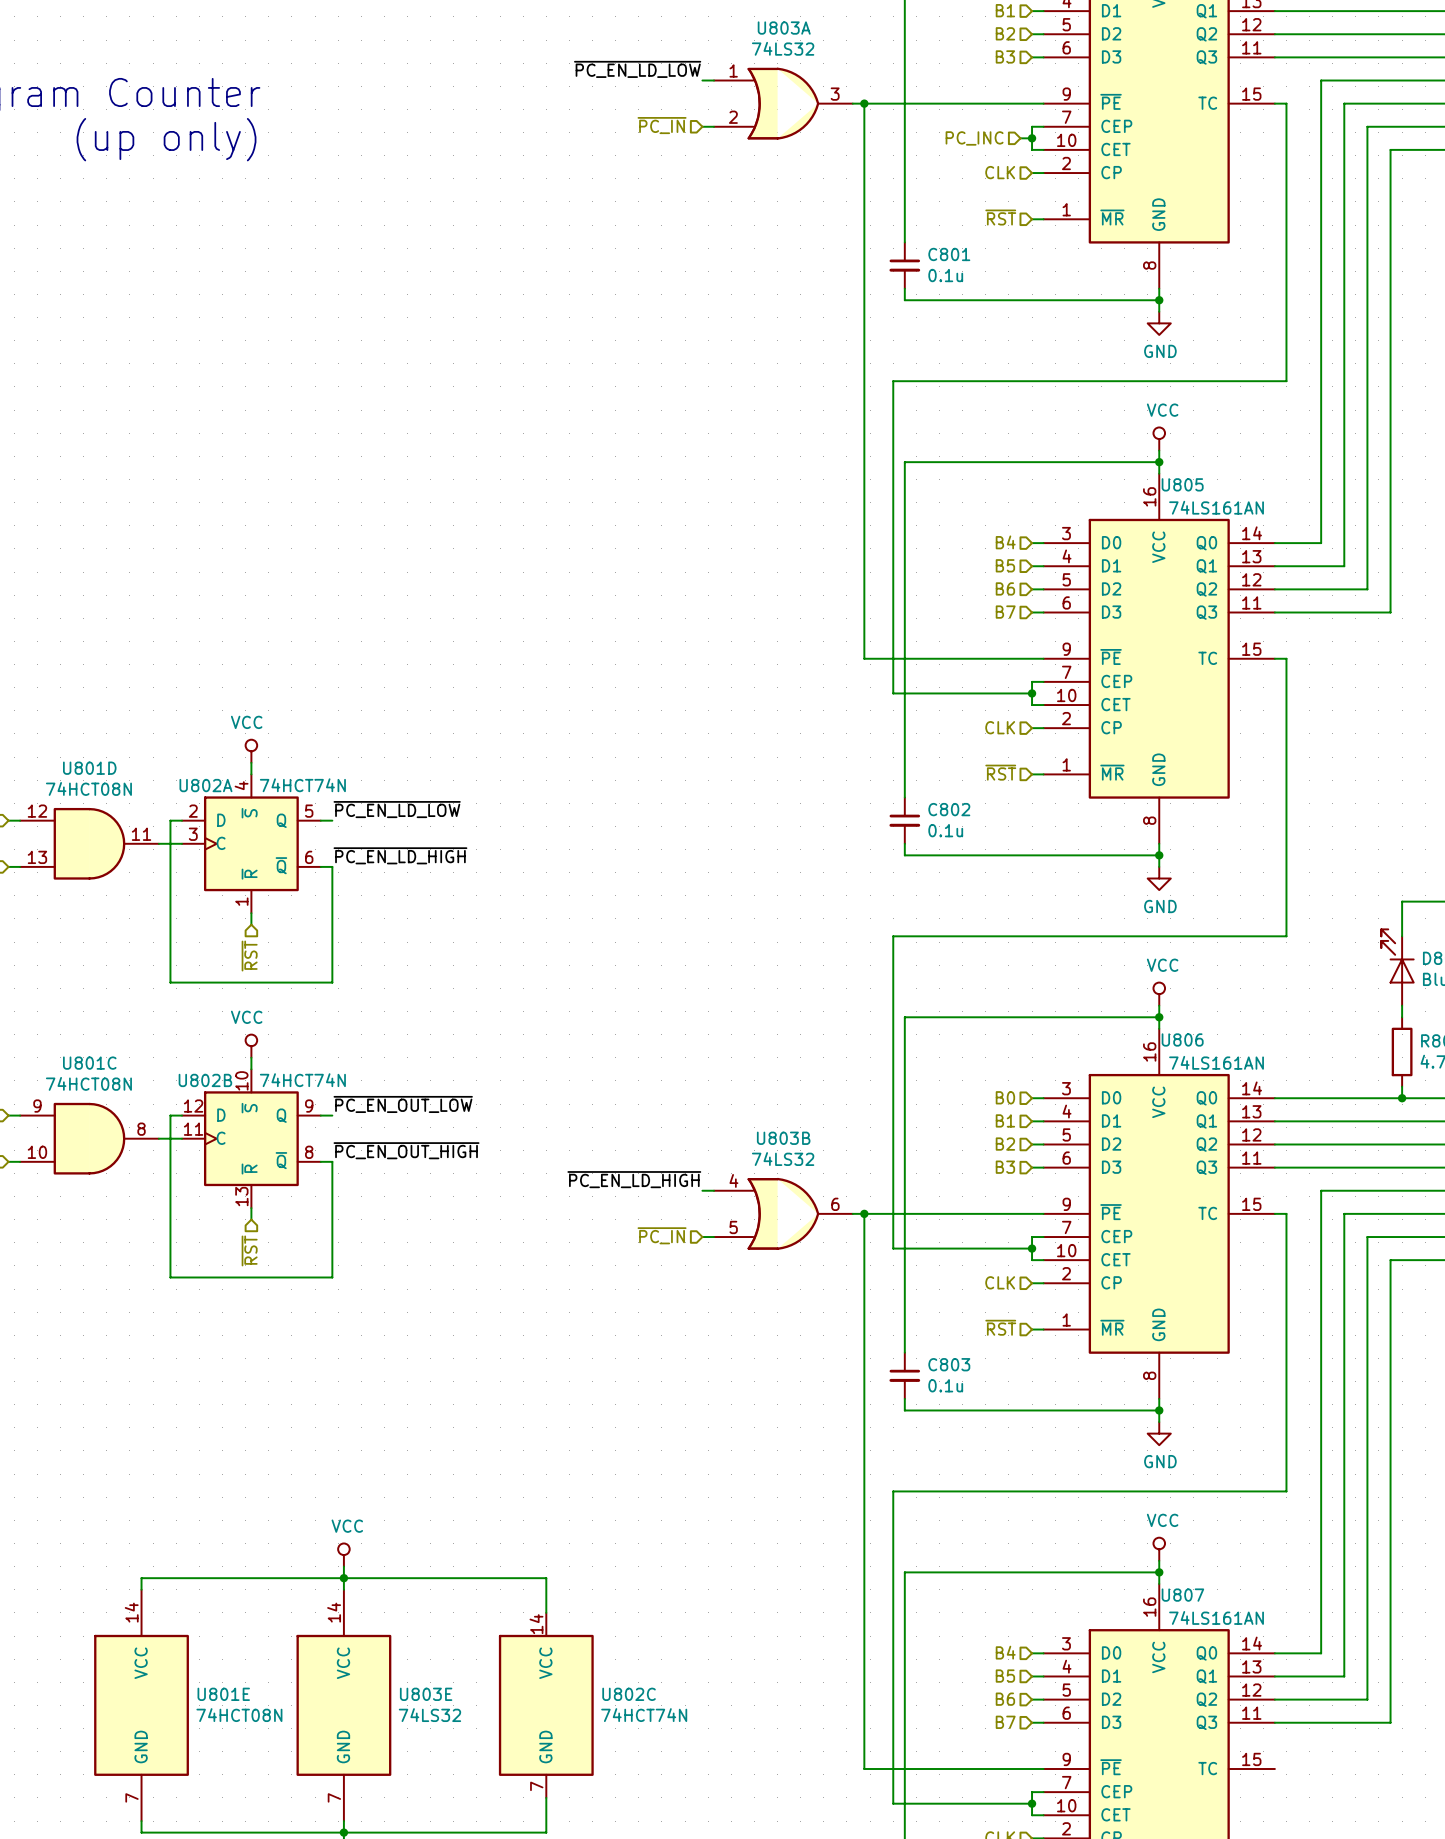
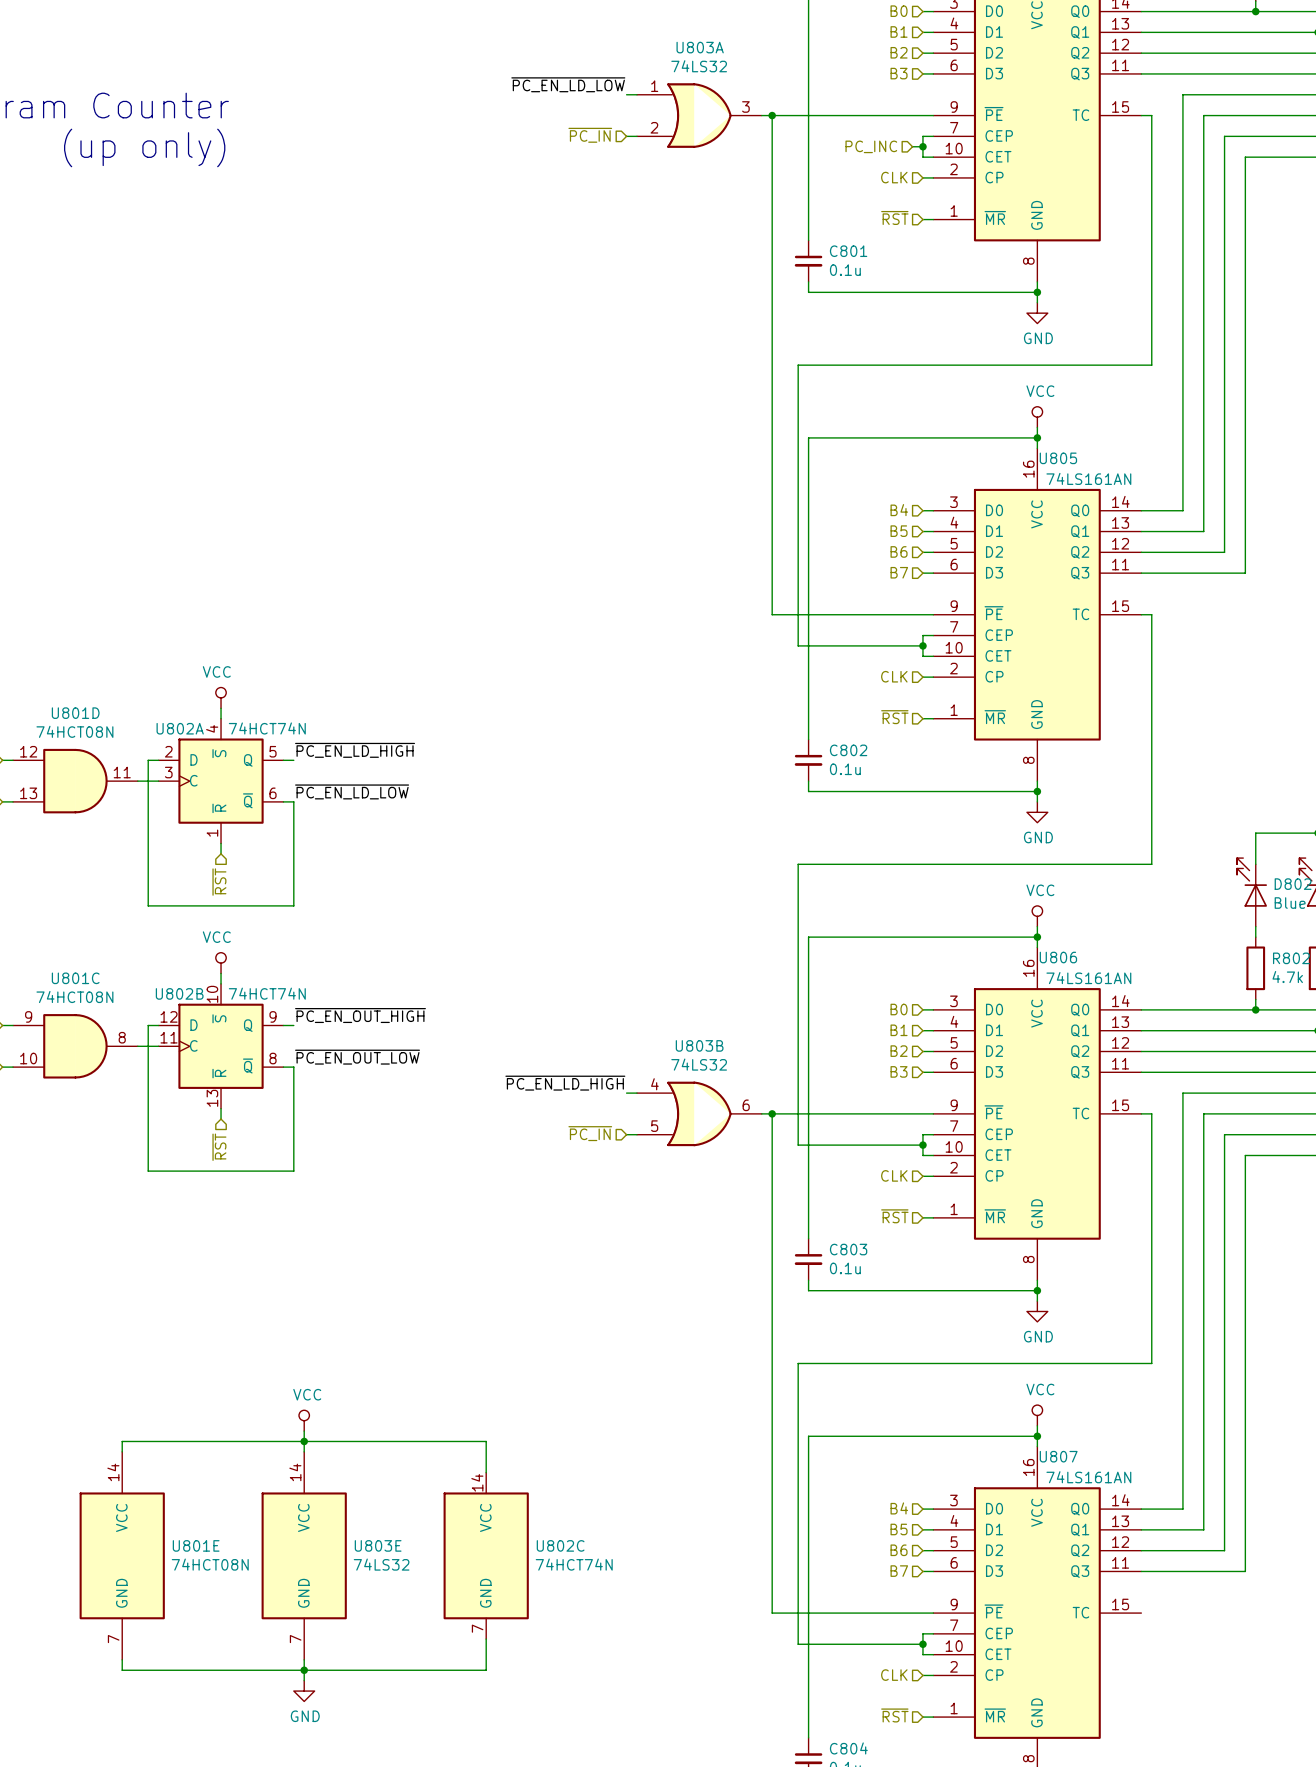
label: ~{PC_EN_LD_LOW} (397, 809) -> ~{PC_EN_LD_HIGH} (355, 750)
label: ~{PC_EN_LD_HIGH} (400, 855) -> ~{PC_EN_LD_LOW} (352, 791)
label: ~{PC_EN_OUT_LOW} (403, 1104) -> ~{PC_EN_OUT_HIGH} (360, 1015)
label: ~{PC_EN_OUT_HIGH} (406, 1150) -> ~{PC_EN_OUT_LOW} (357, 1057)

